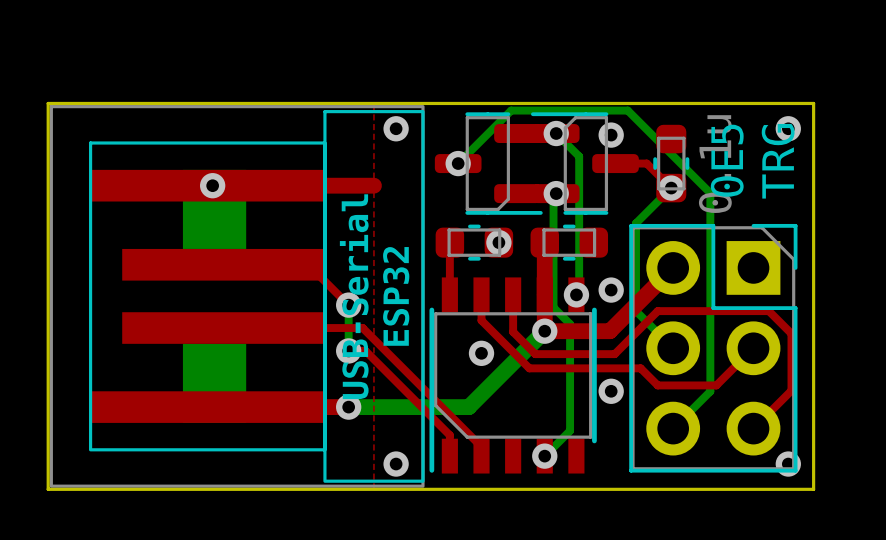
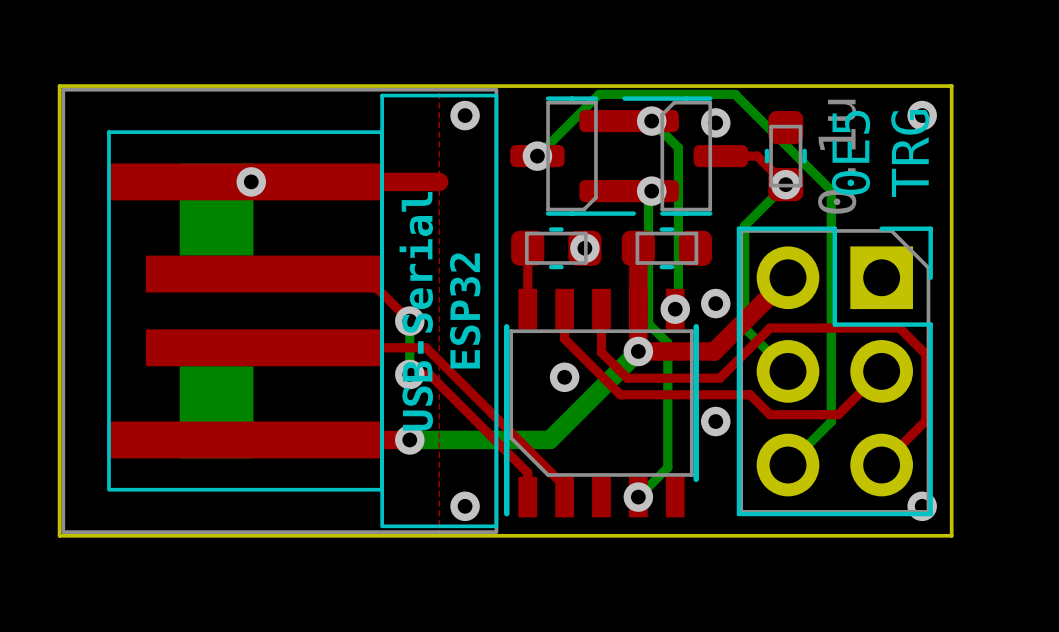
part footprint: [49, 105, 425, 488] -> [61, 87, 499, 534]

